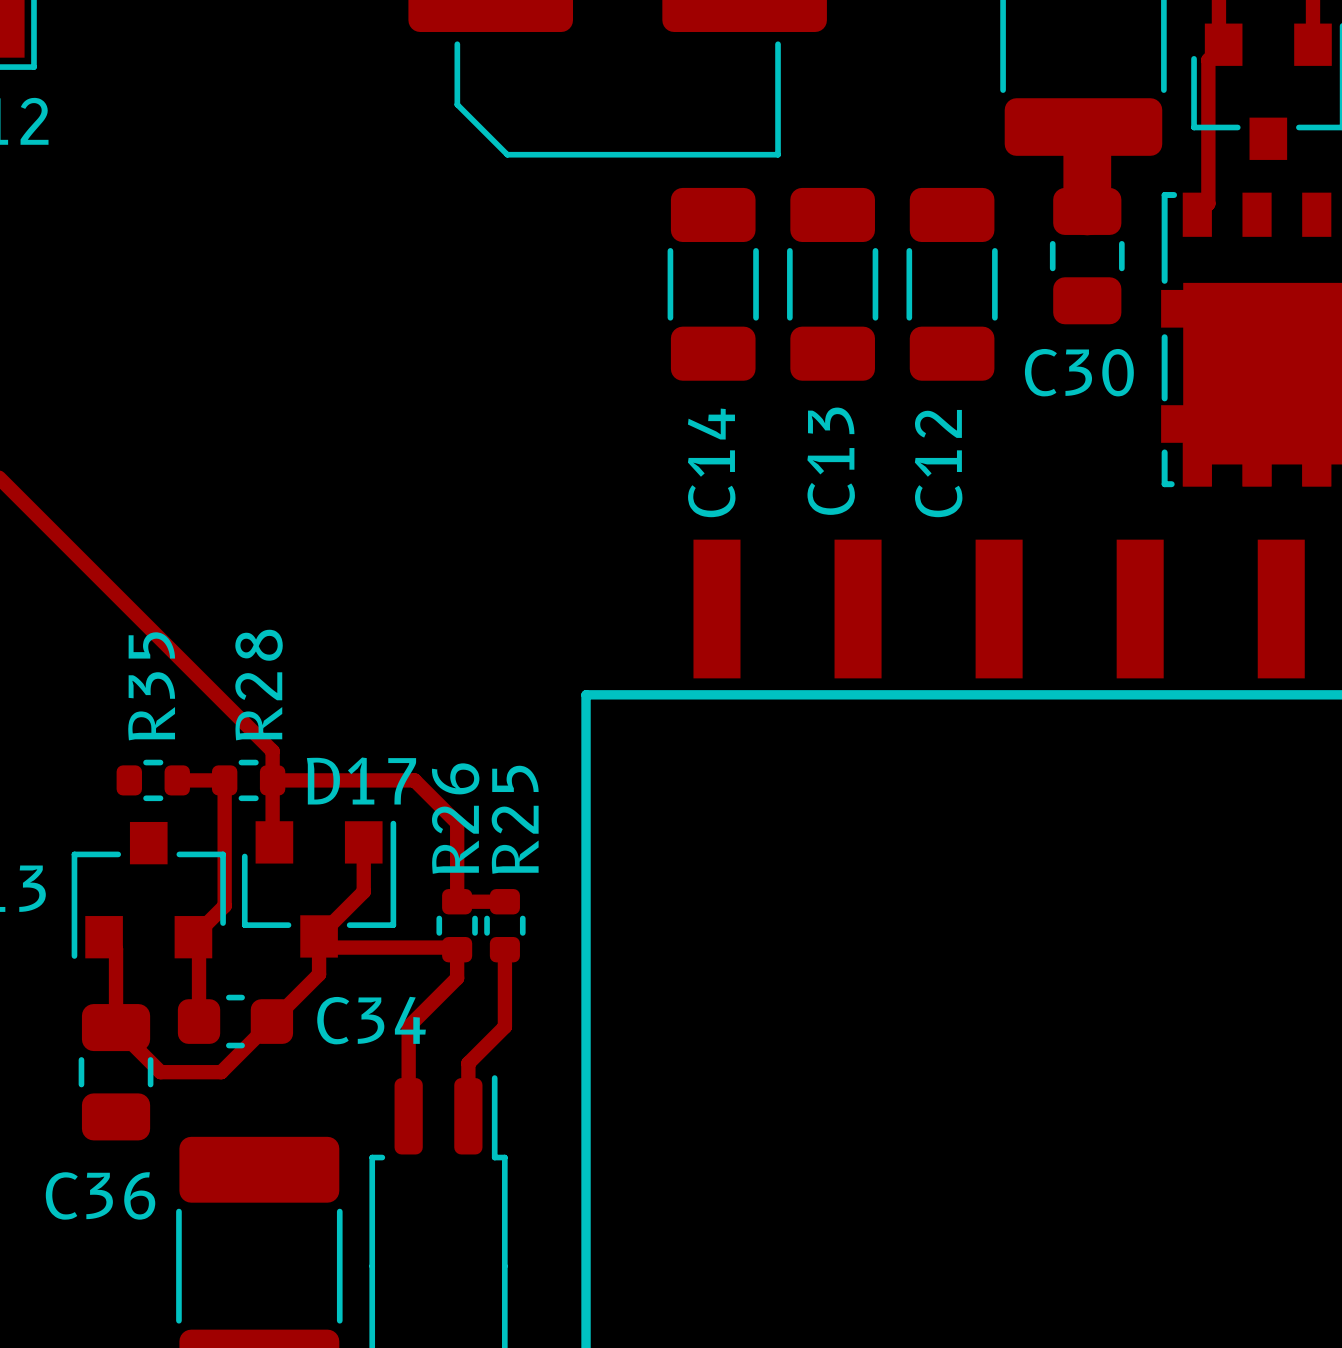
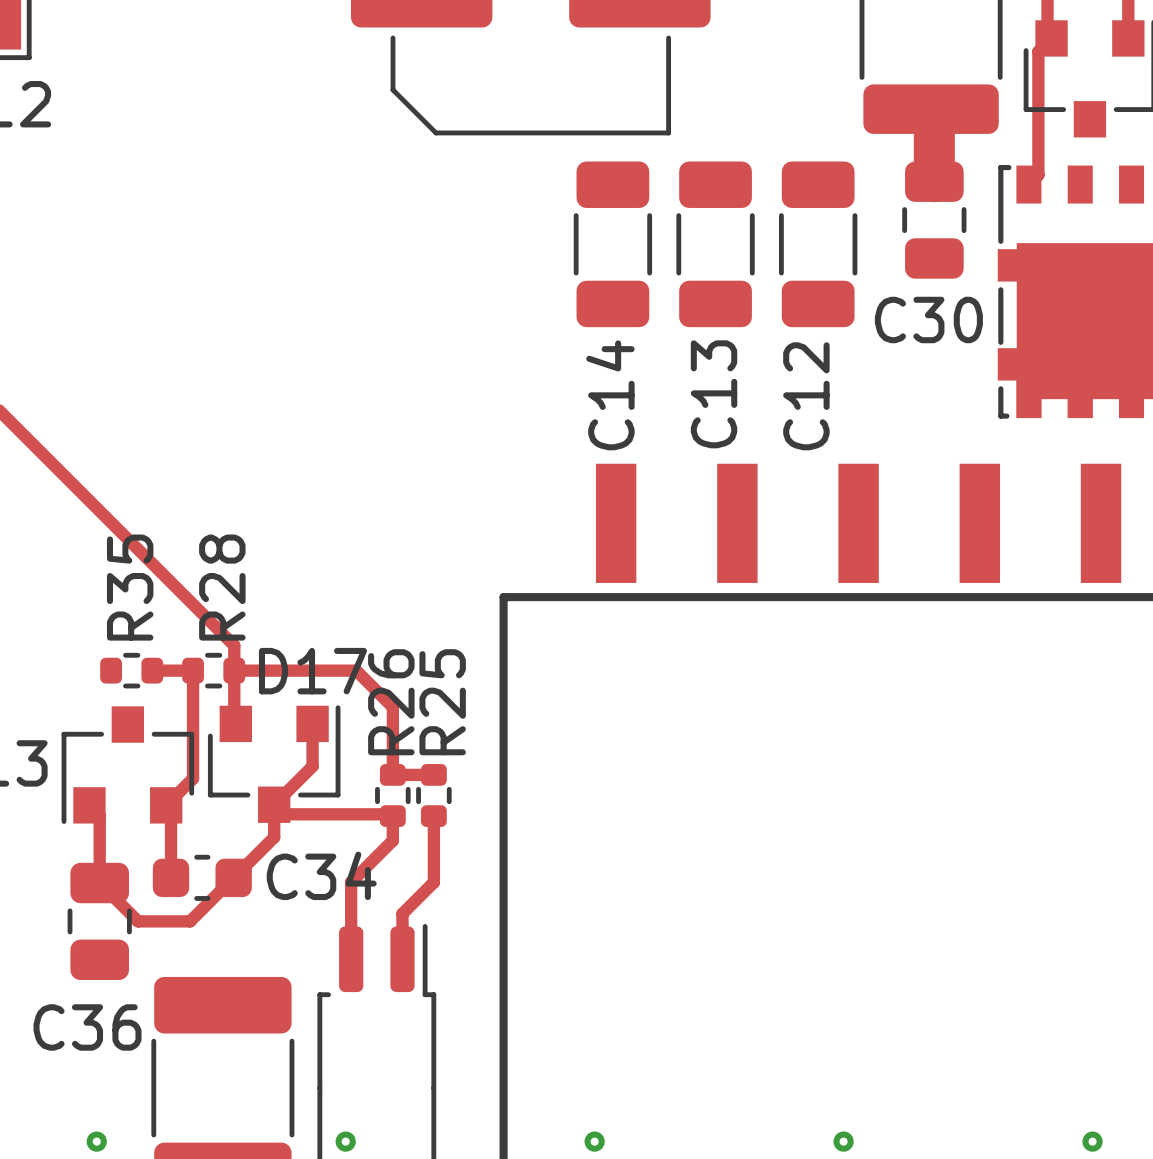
via: none -> (96, 1141)
via: none -> (345, 1141)
via: none -> (594, 1141)
via: none -> (843, 1141)
via: none -> (1092, 1141)

